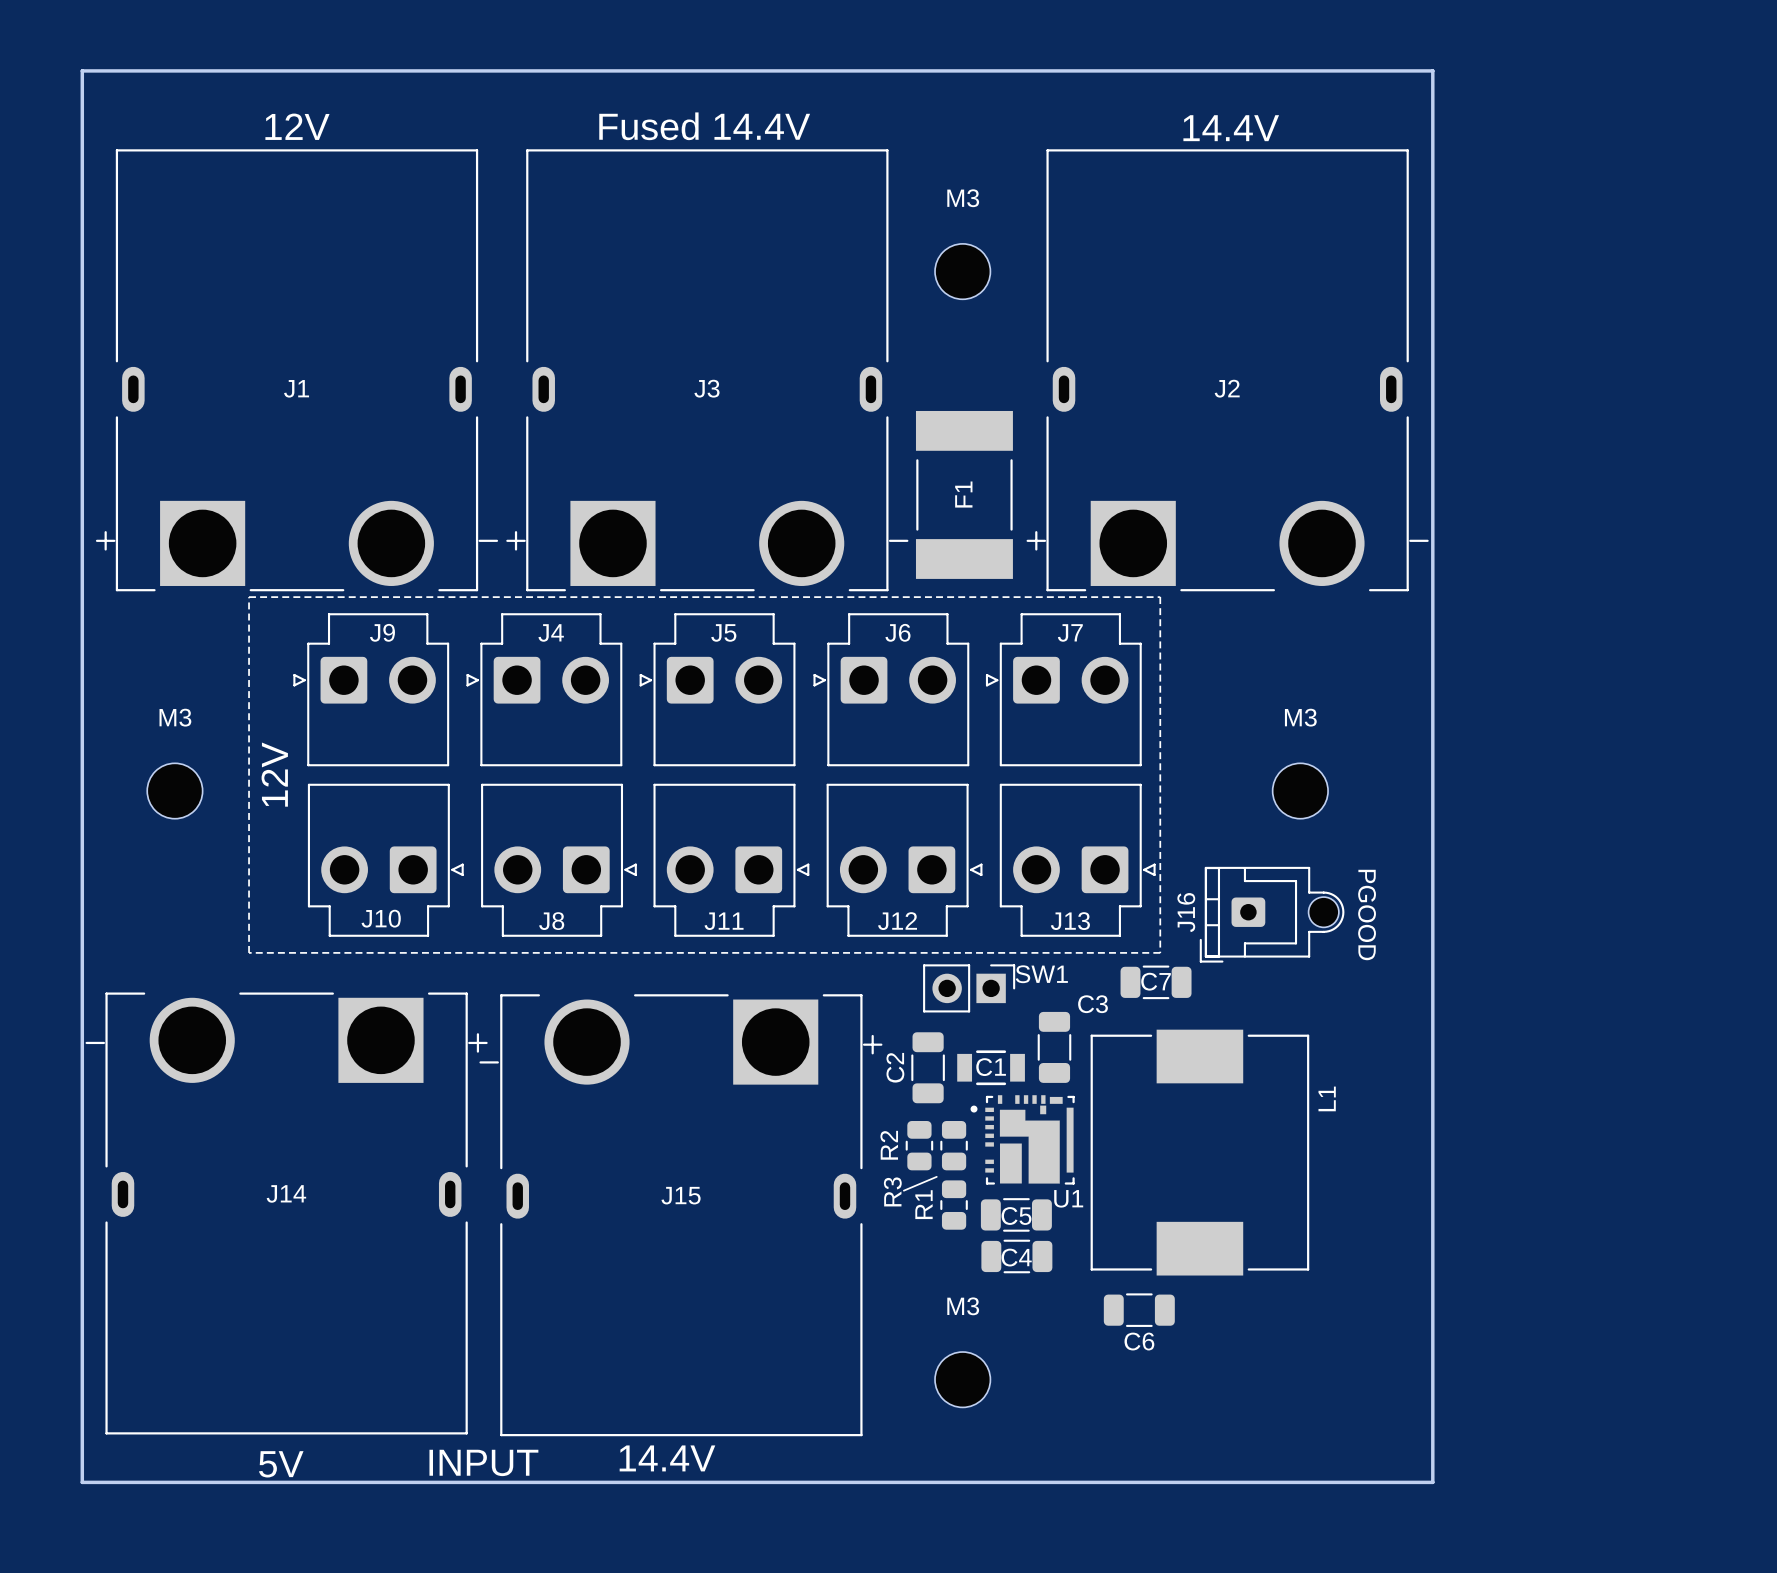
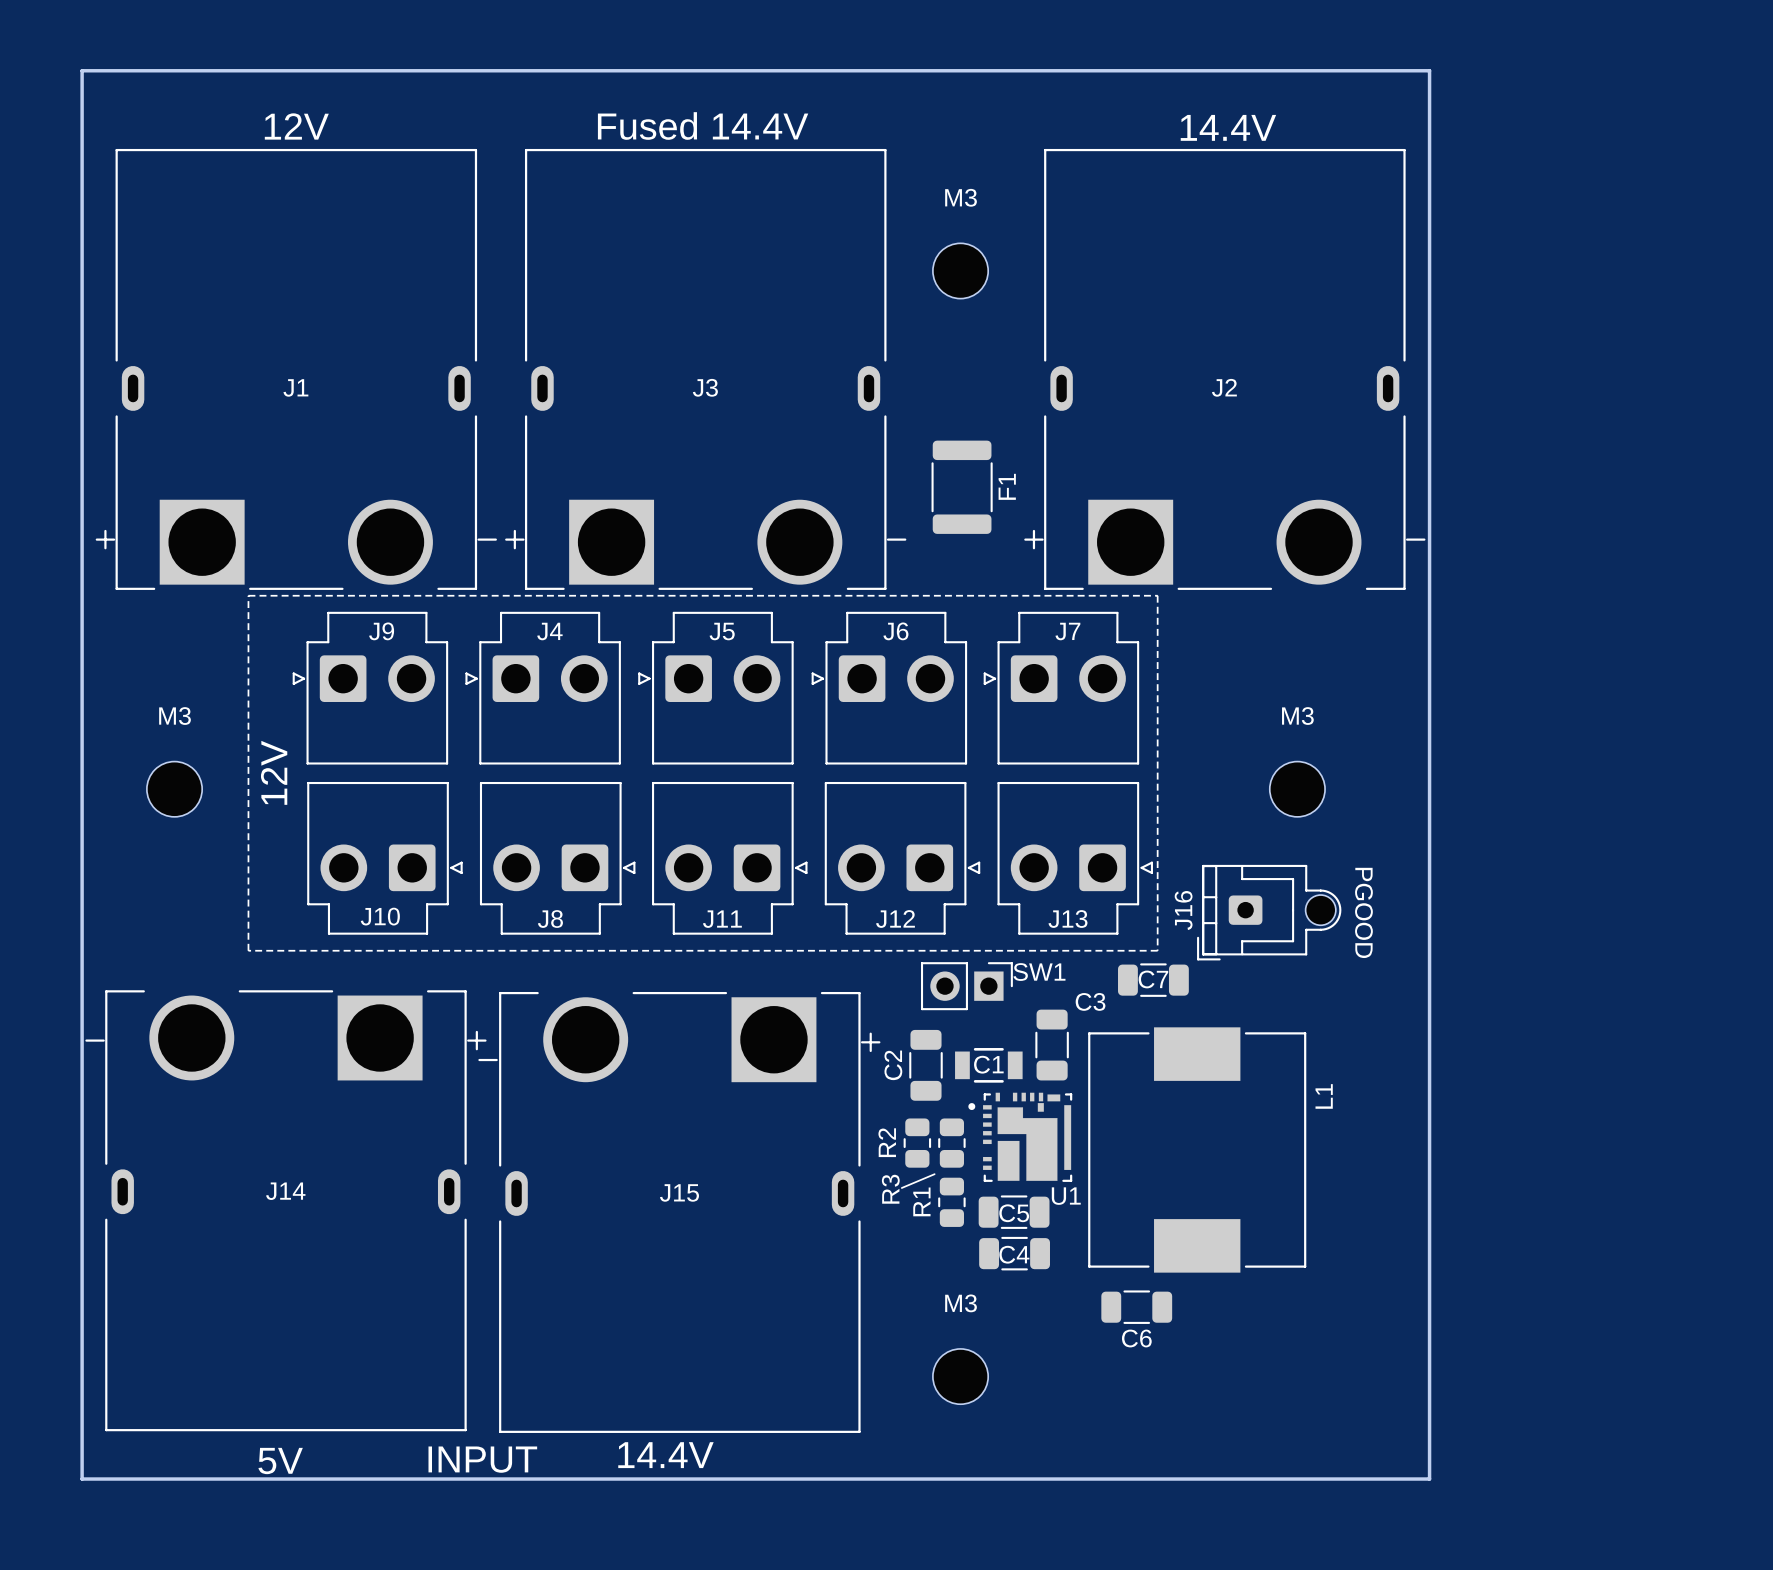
F1 footprint: [915, 410, 1013, 579] -> [931, 440, 993, 534]
F1 name position: F1 (963, 494) -> F1 (1007, 486)

